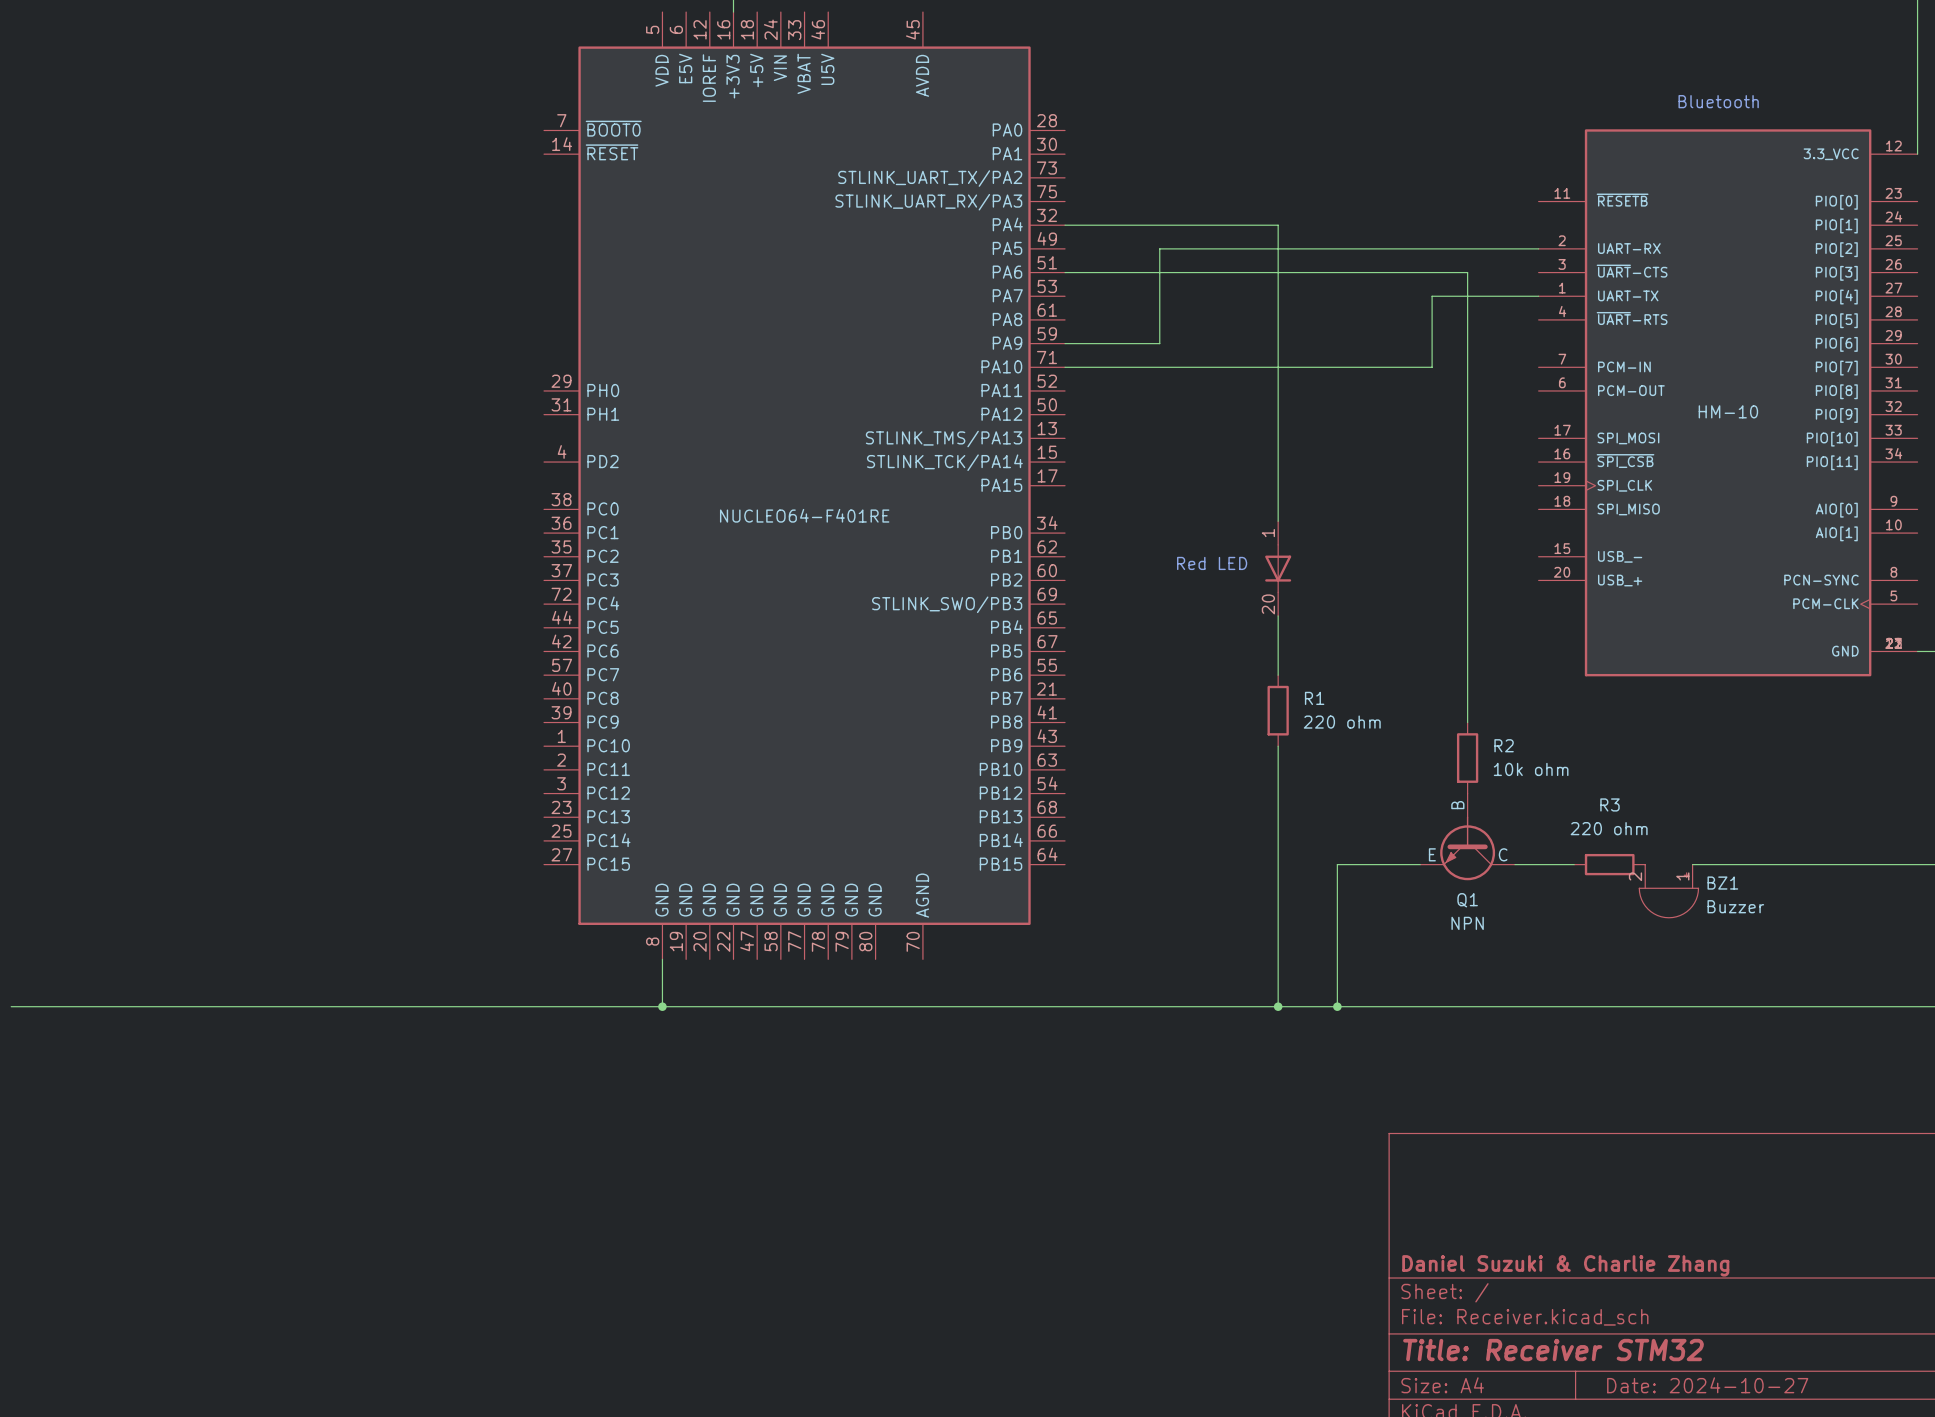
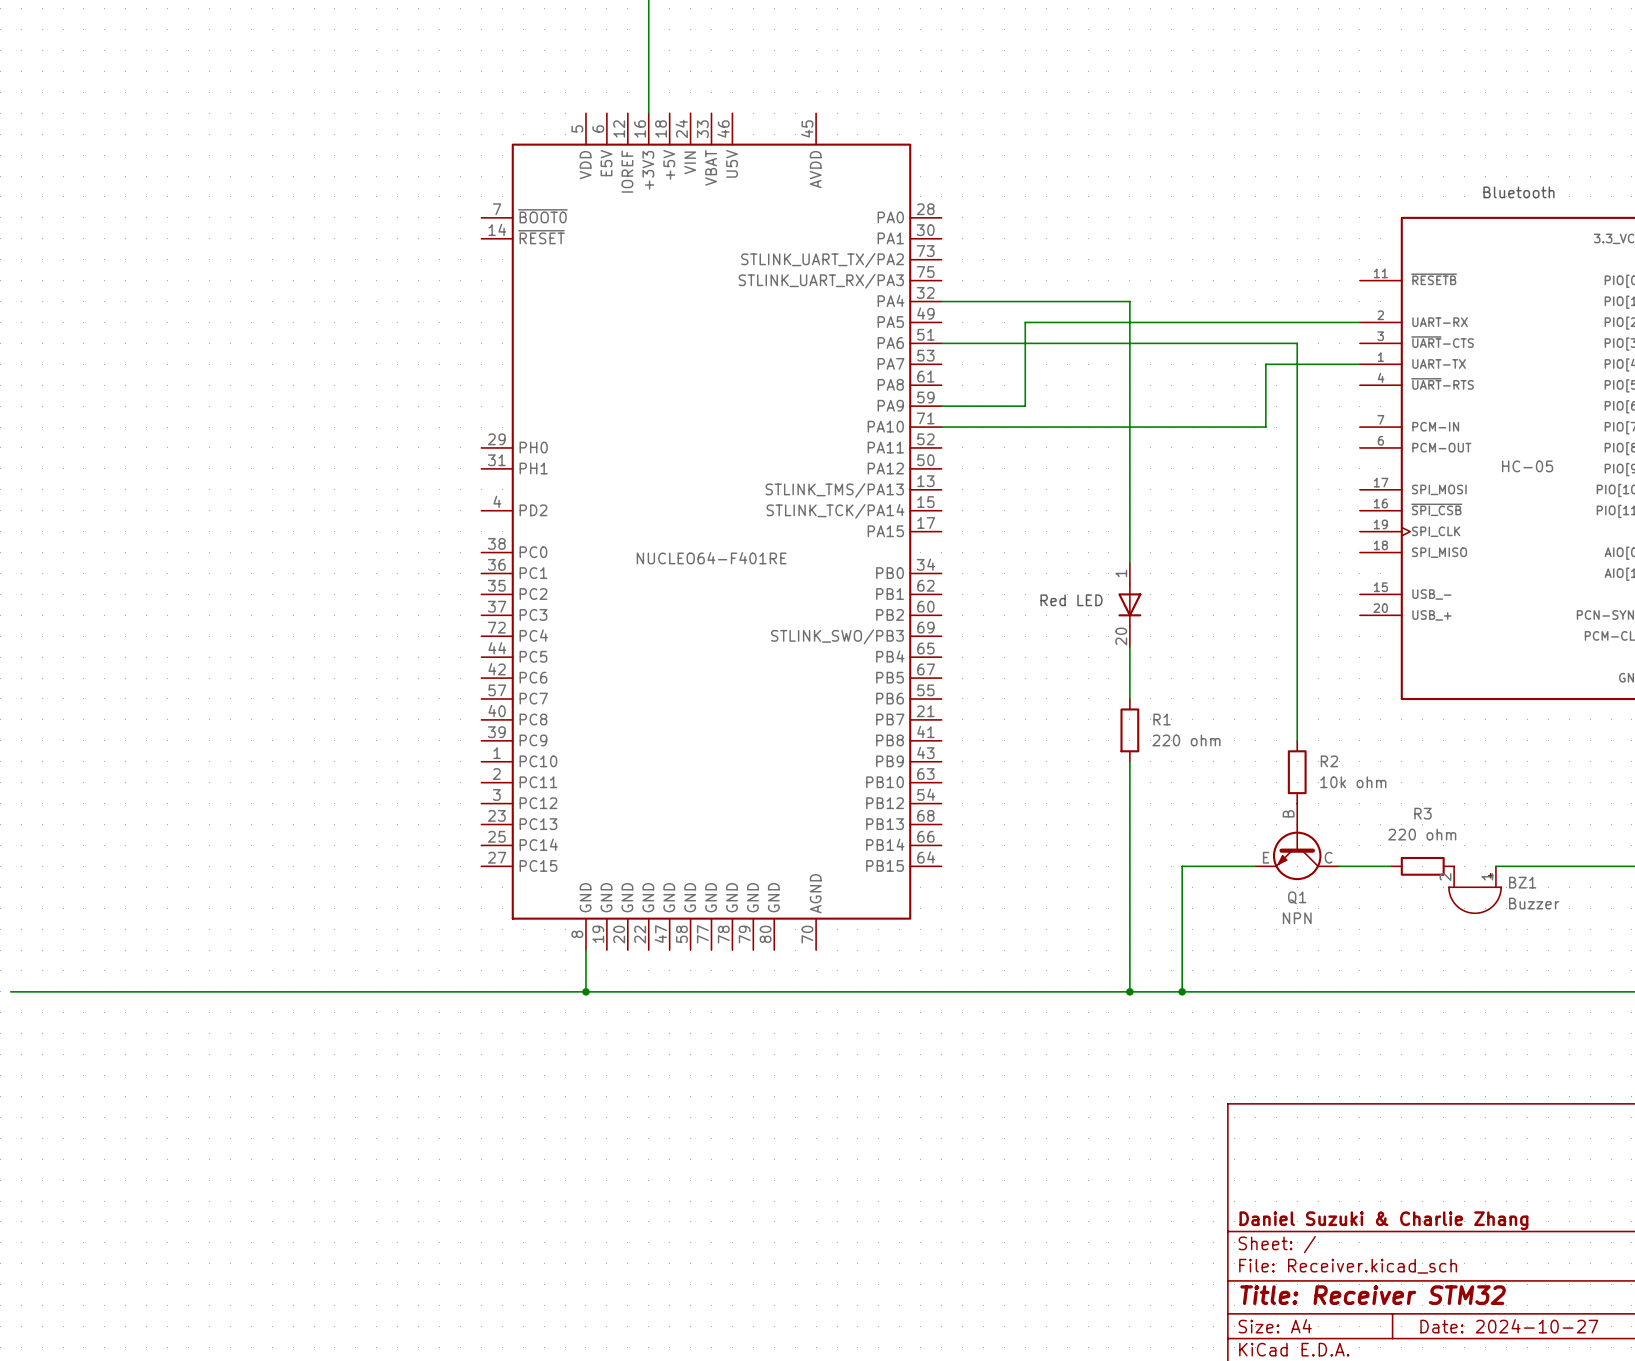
part value: HM-10 (1728, 411) -> HC-05 (1527, 466)

